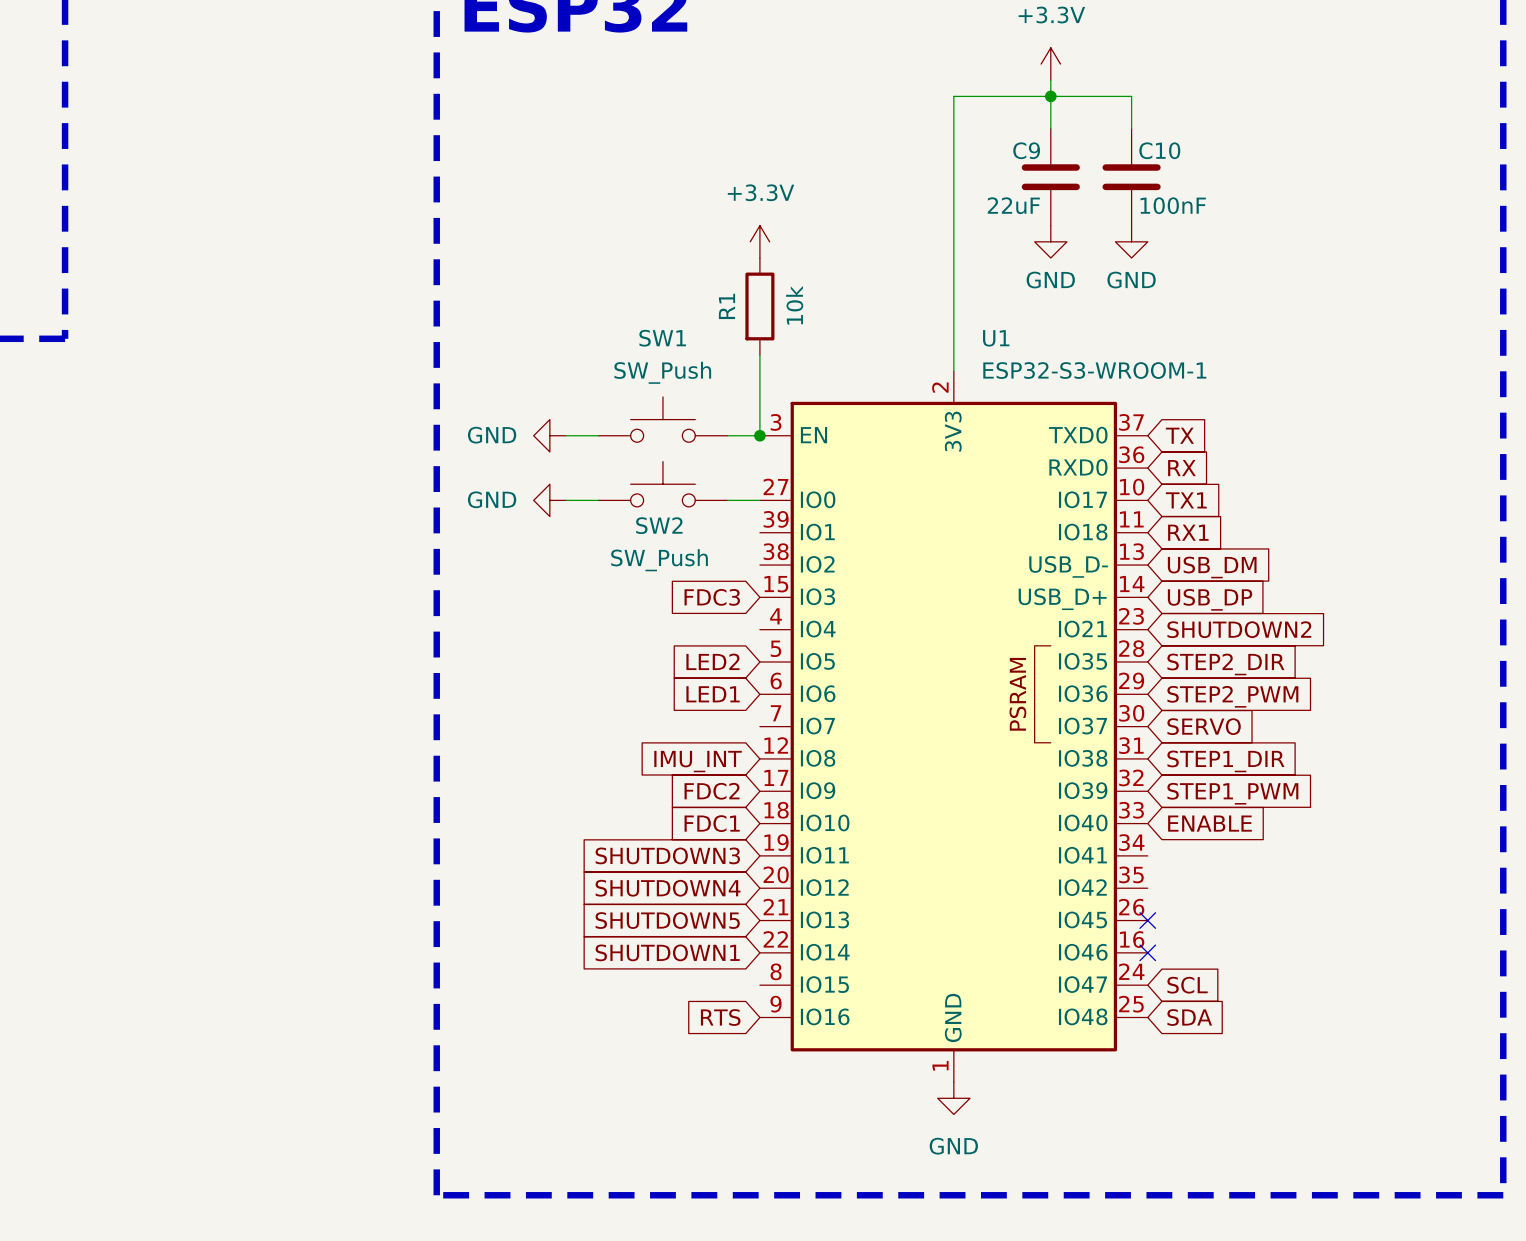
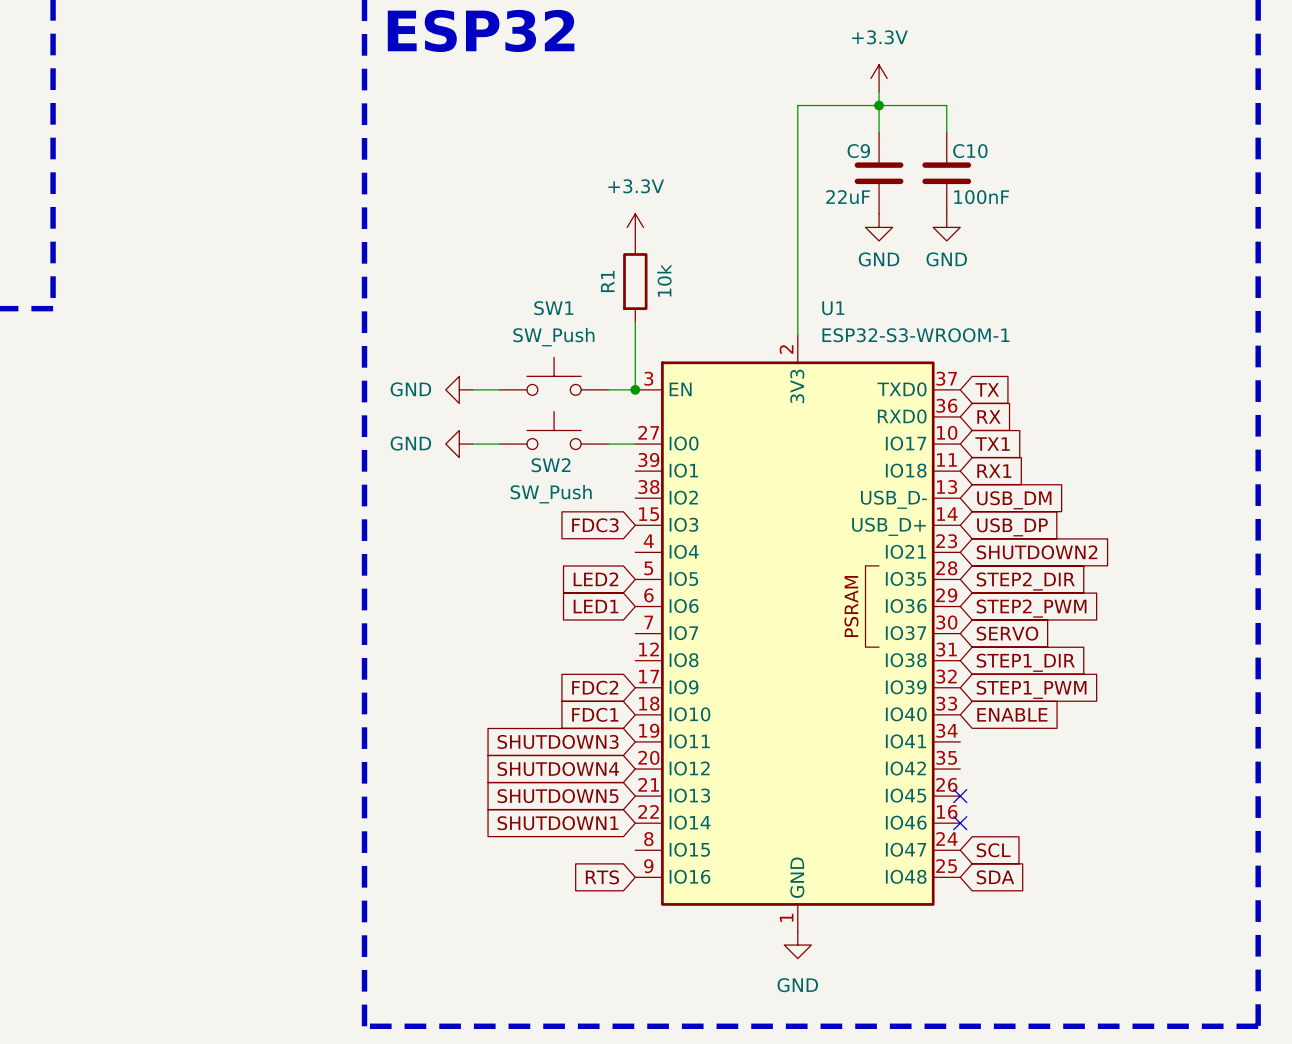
global label: IMU_INT (698, 761) -> none

